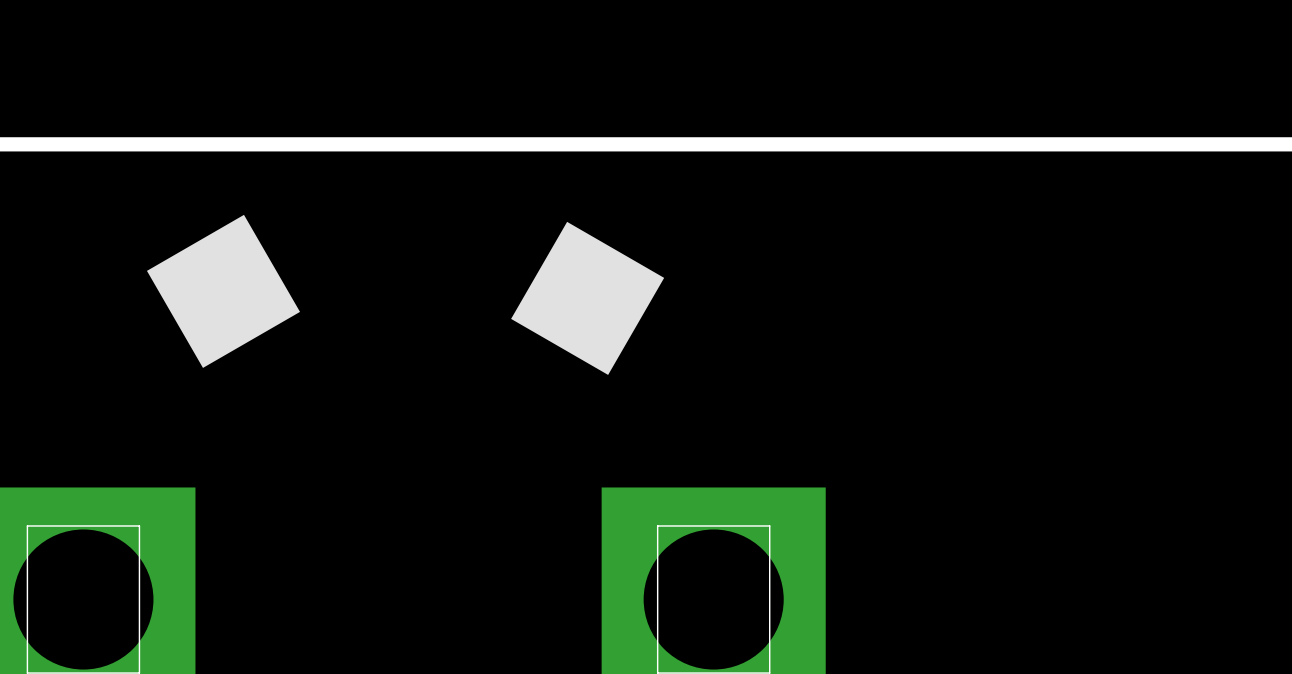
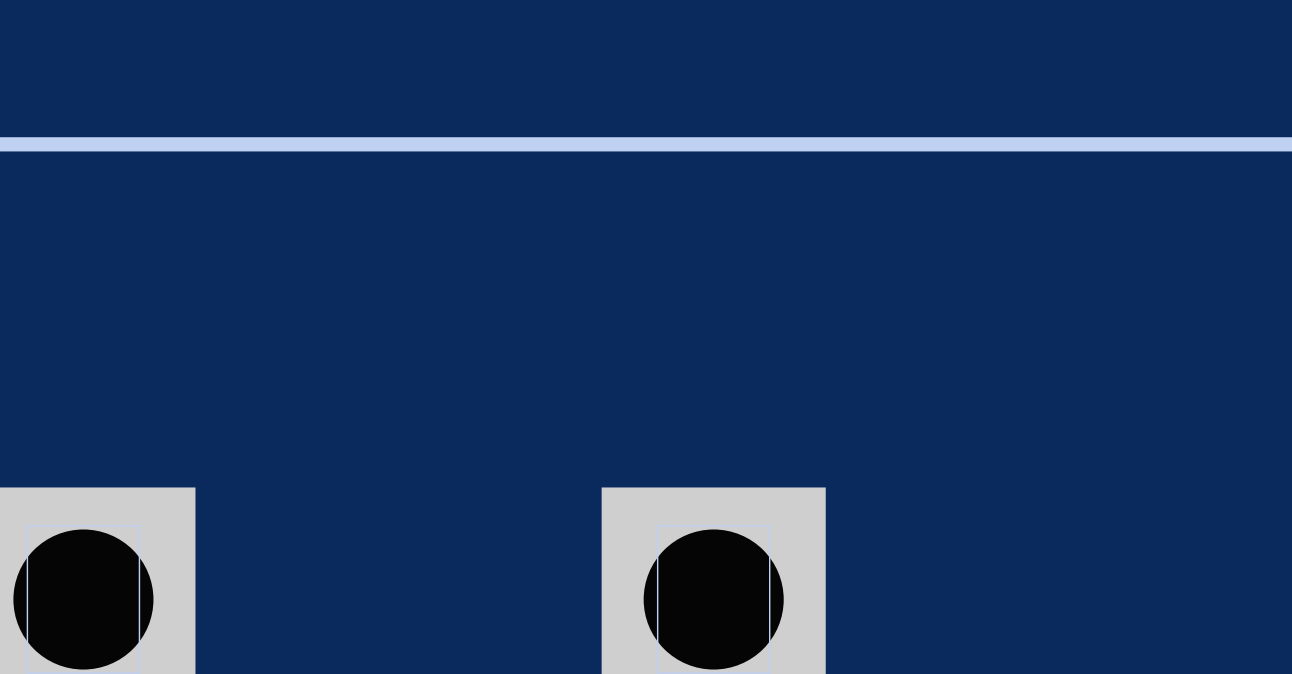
drawing: [146, 214, 301, 368] -> none
drawing: [511, 221, 665, 375] -> none

